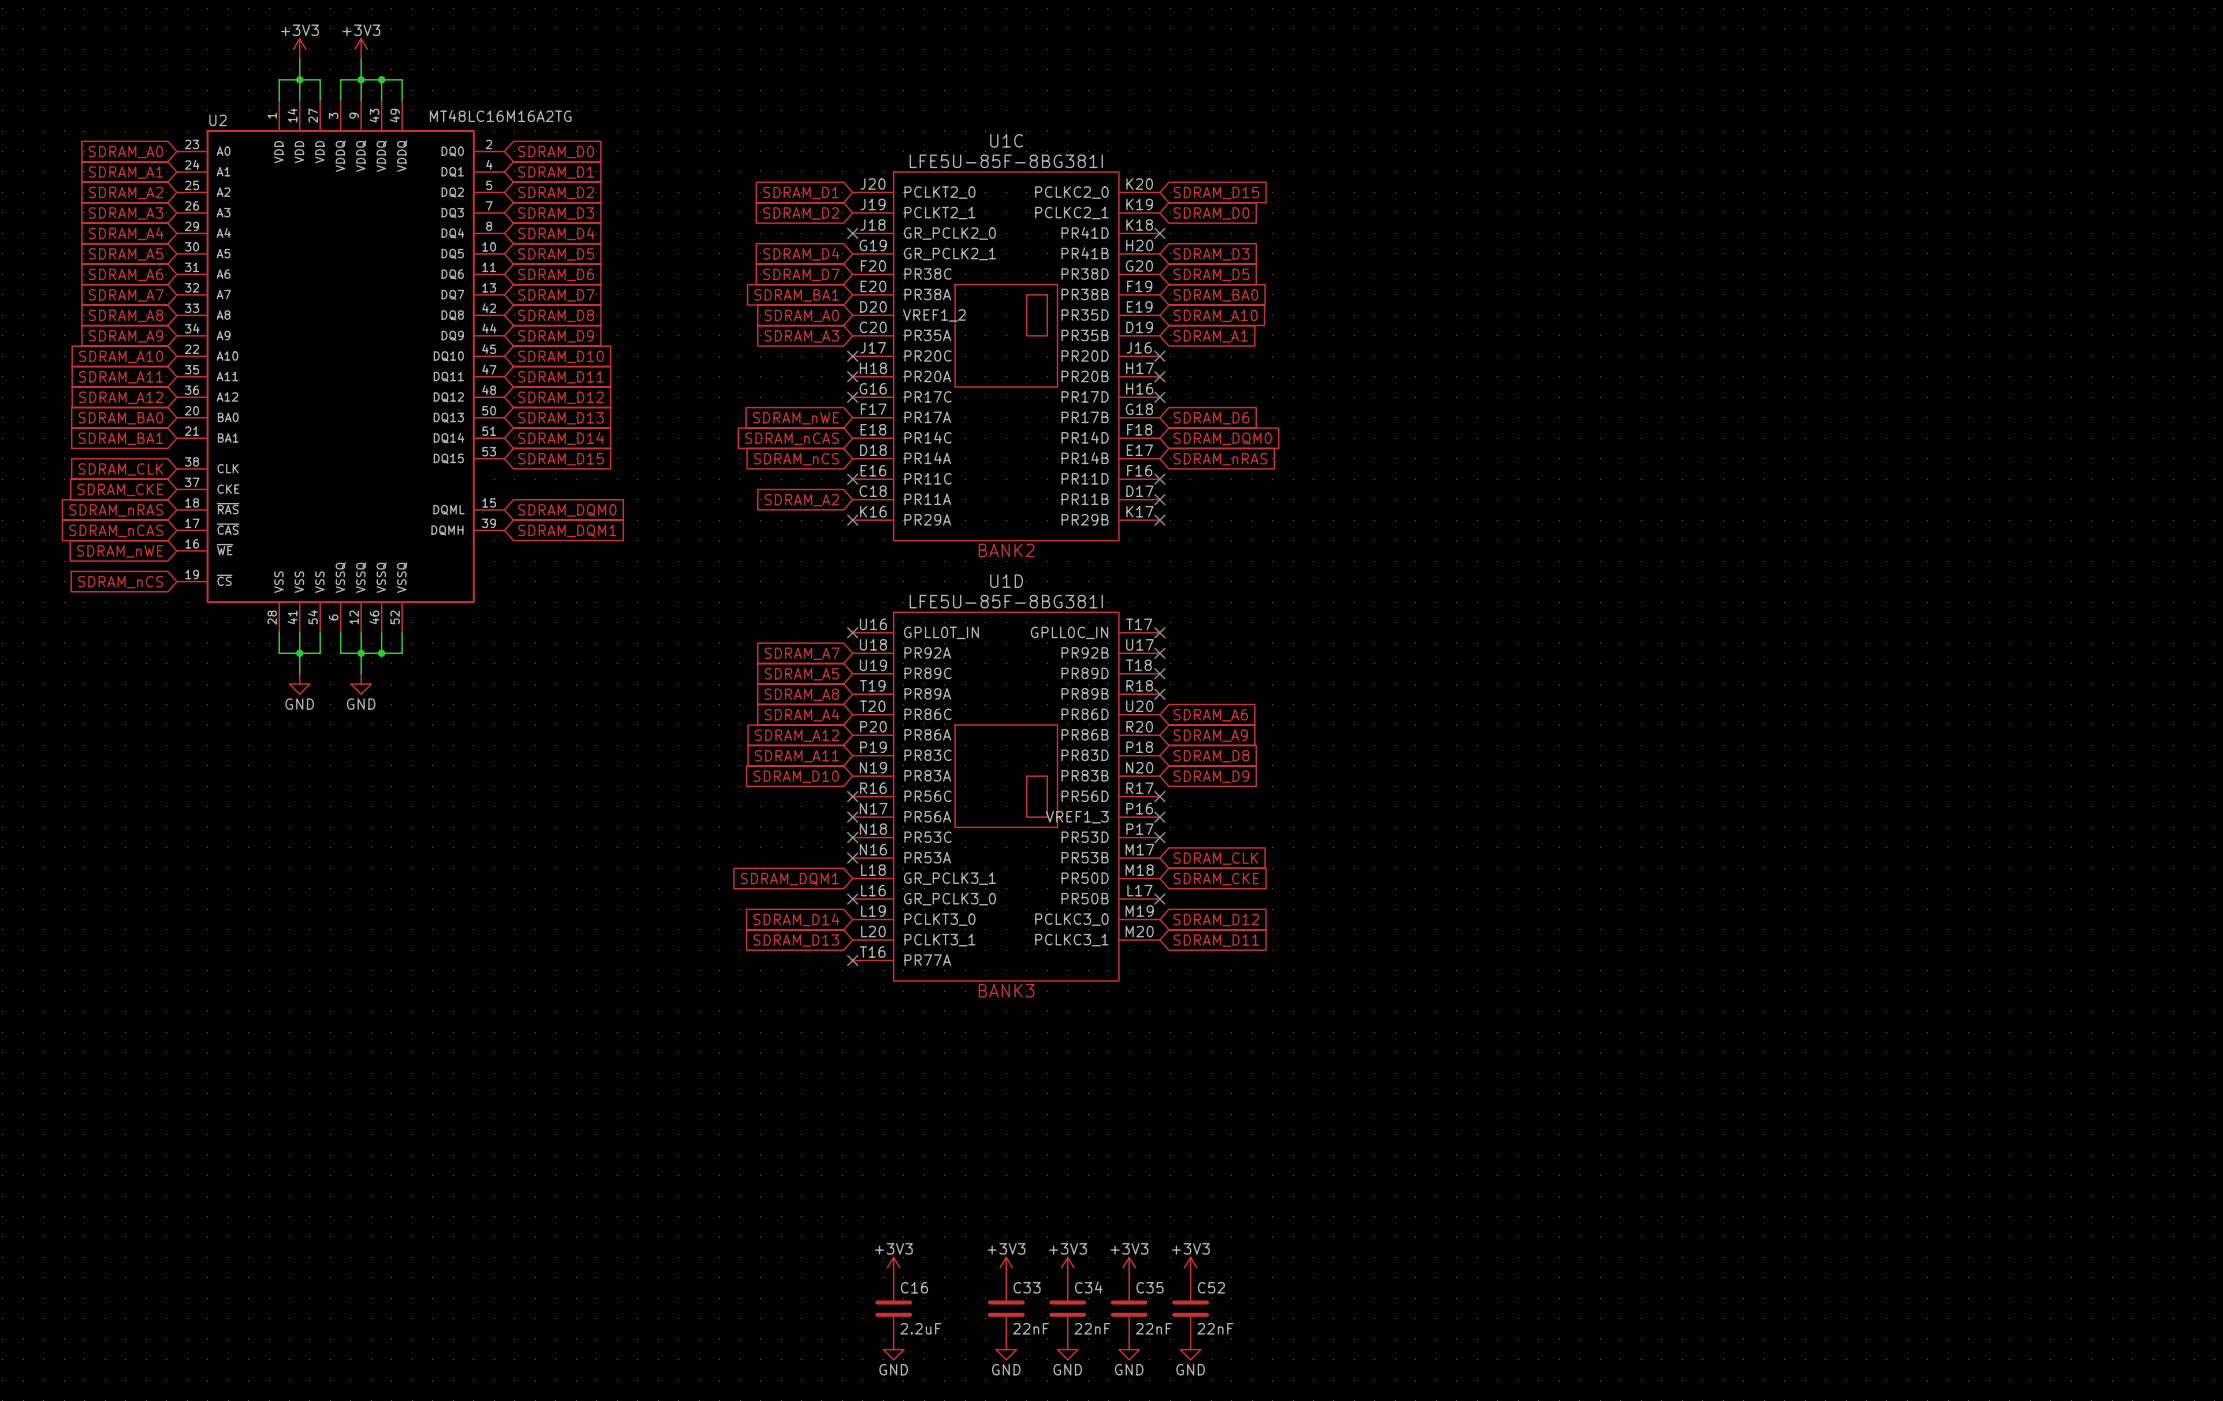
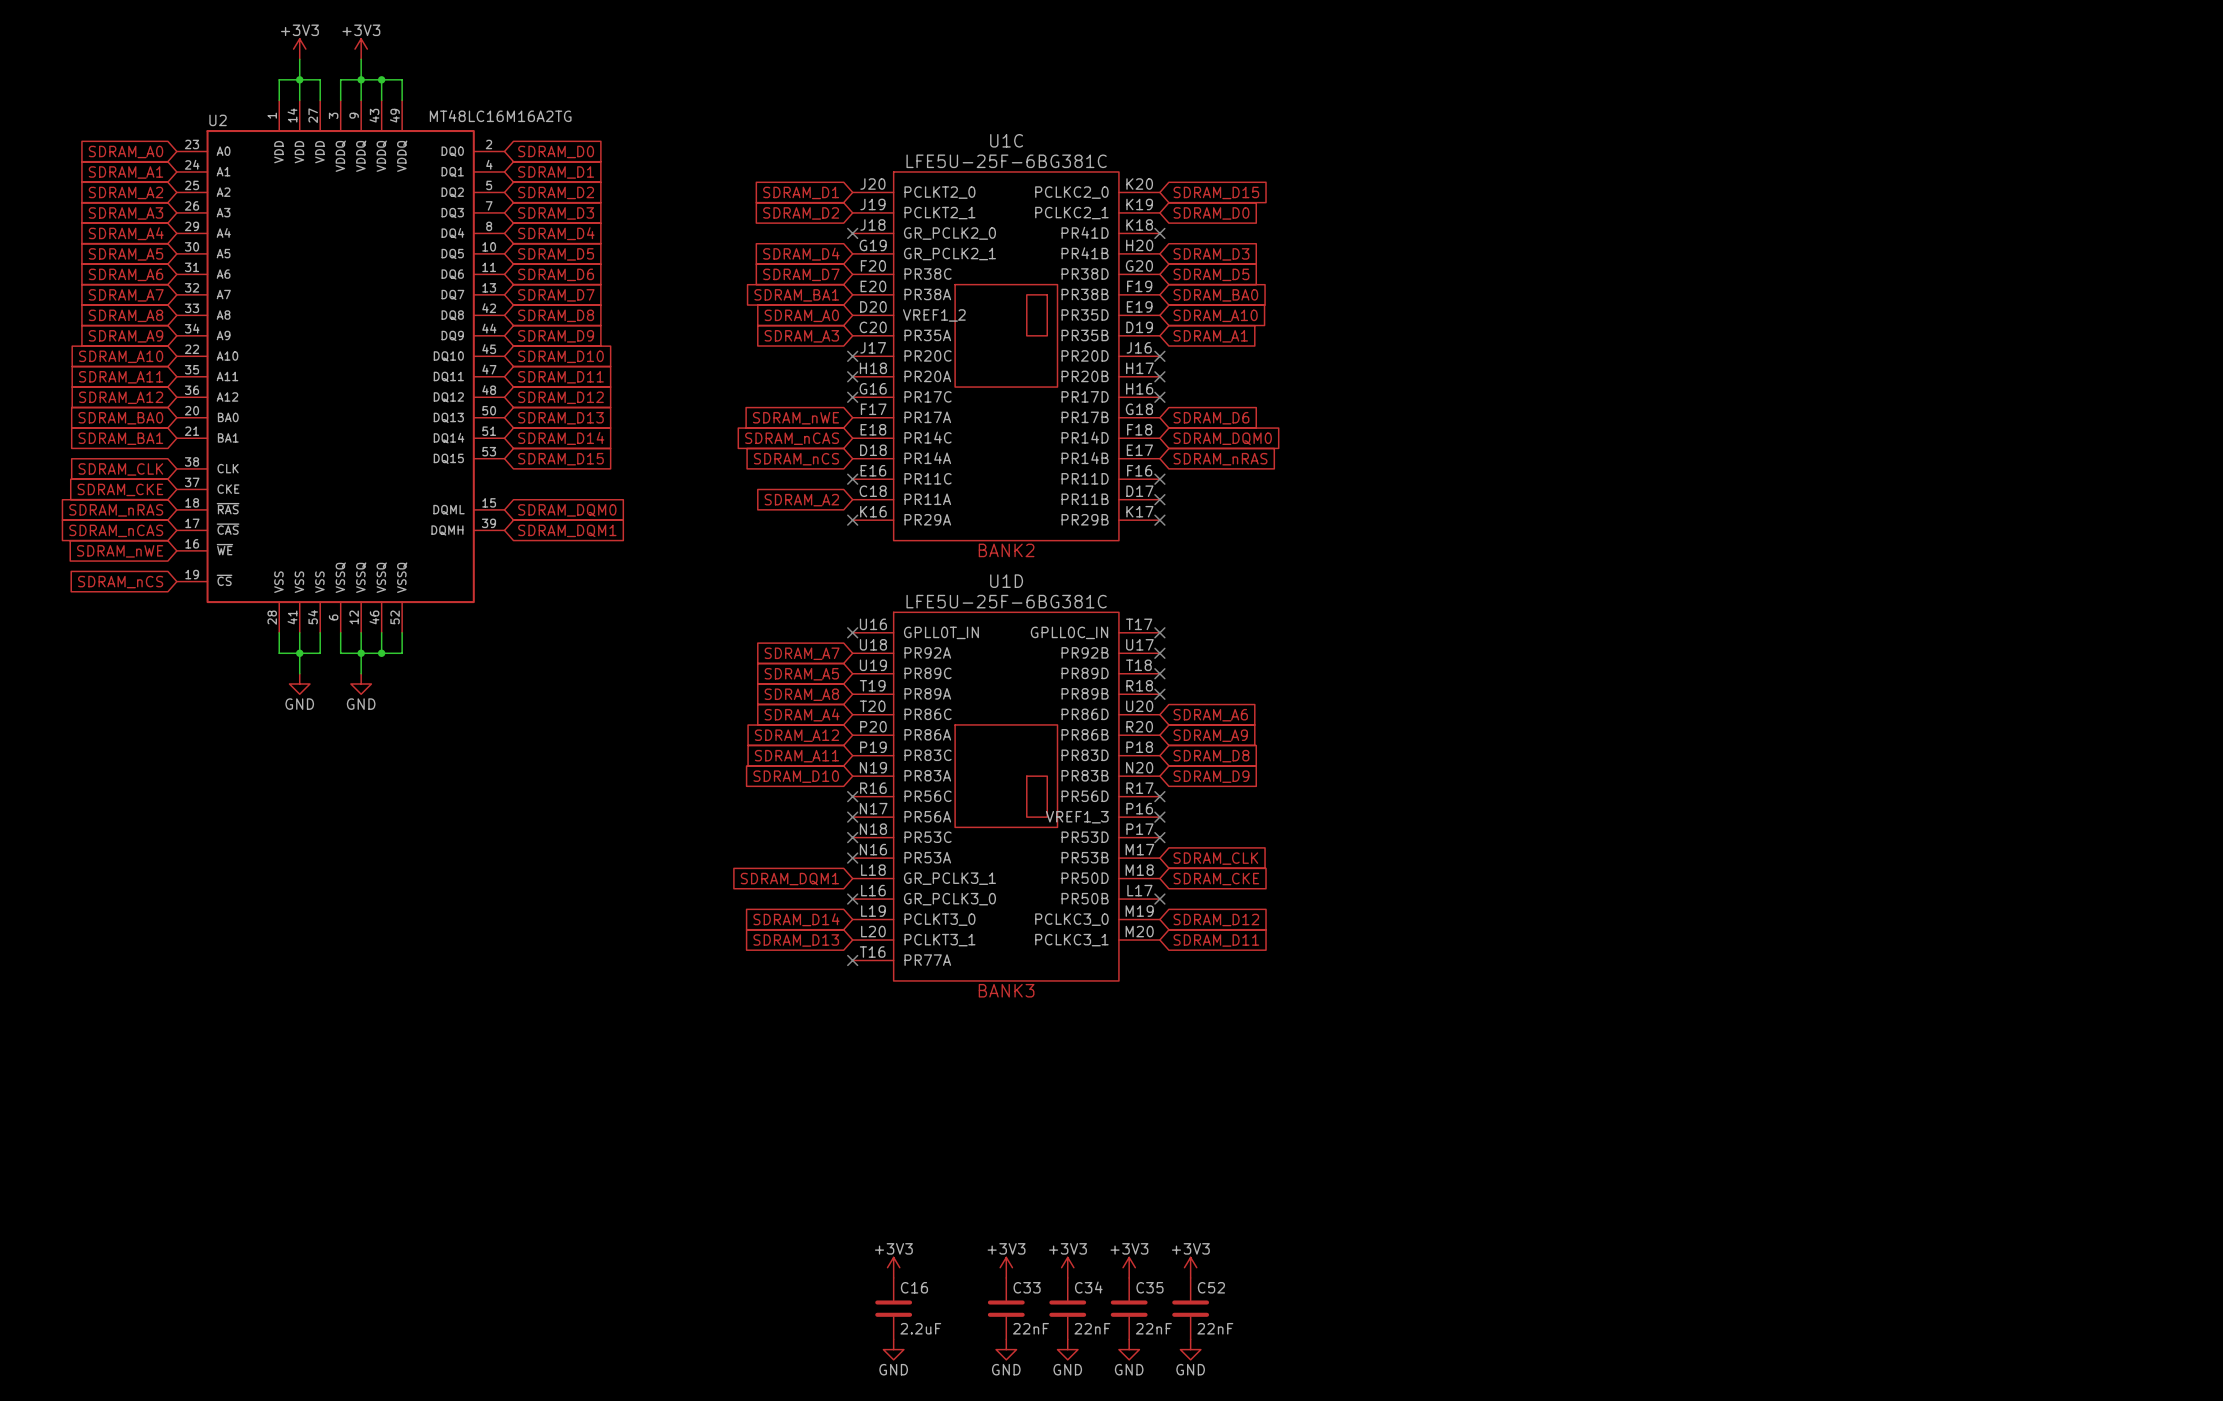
U1C value: LFE5U-85F-8BG381I (1006, 161) -> LFE5U-25F-6BG381C (1006, 161)
U1D value: LFE5U-85F-8BG381I (1006, 601) -> LFE5U-25F-6BG381C (1006, 601)

